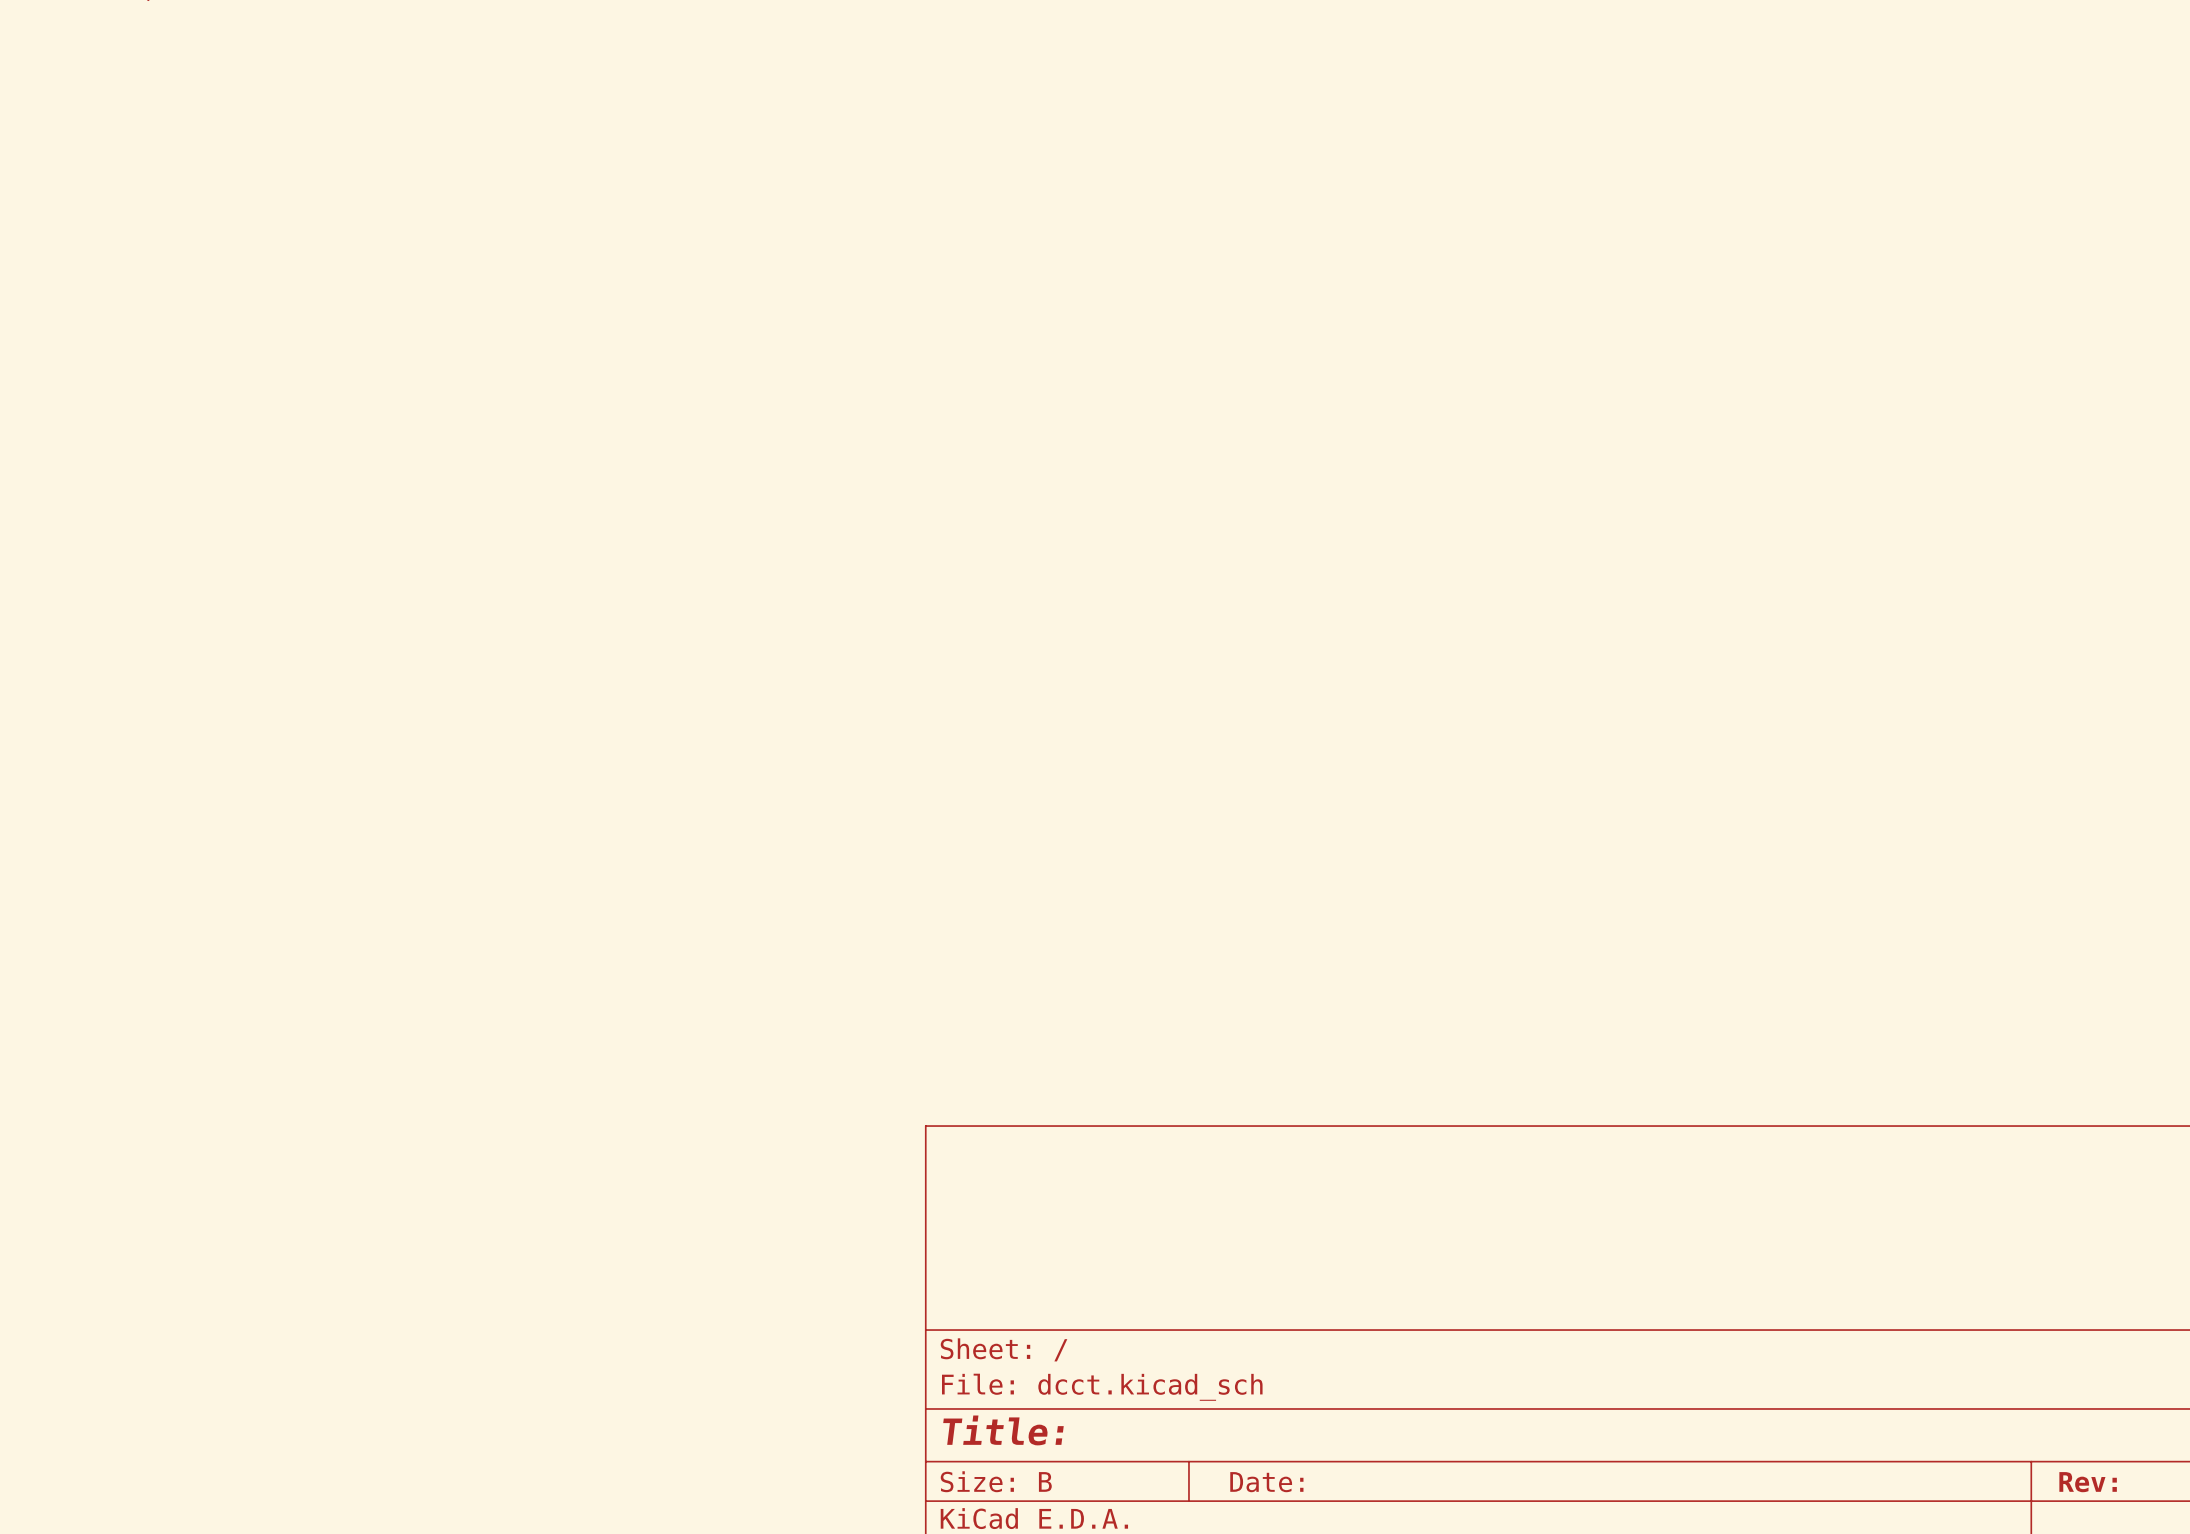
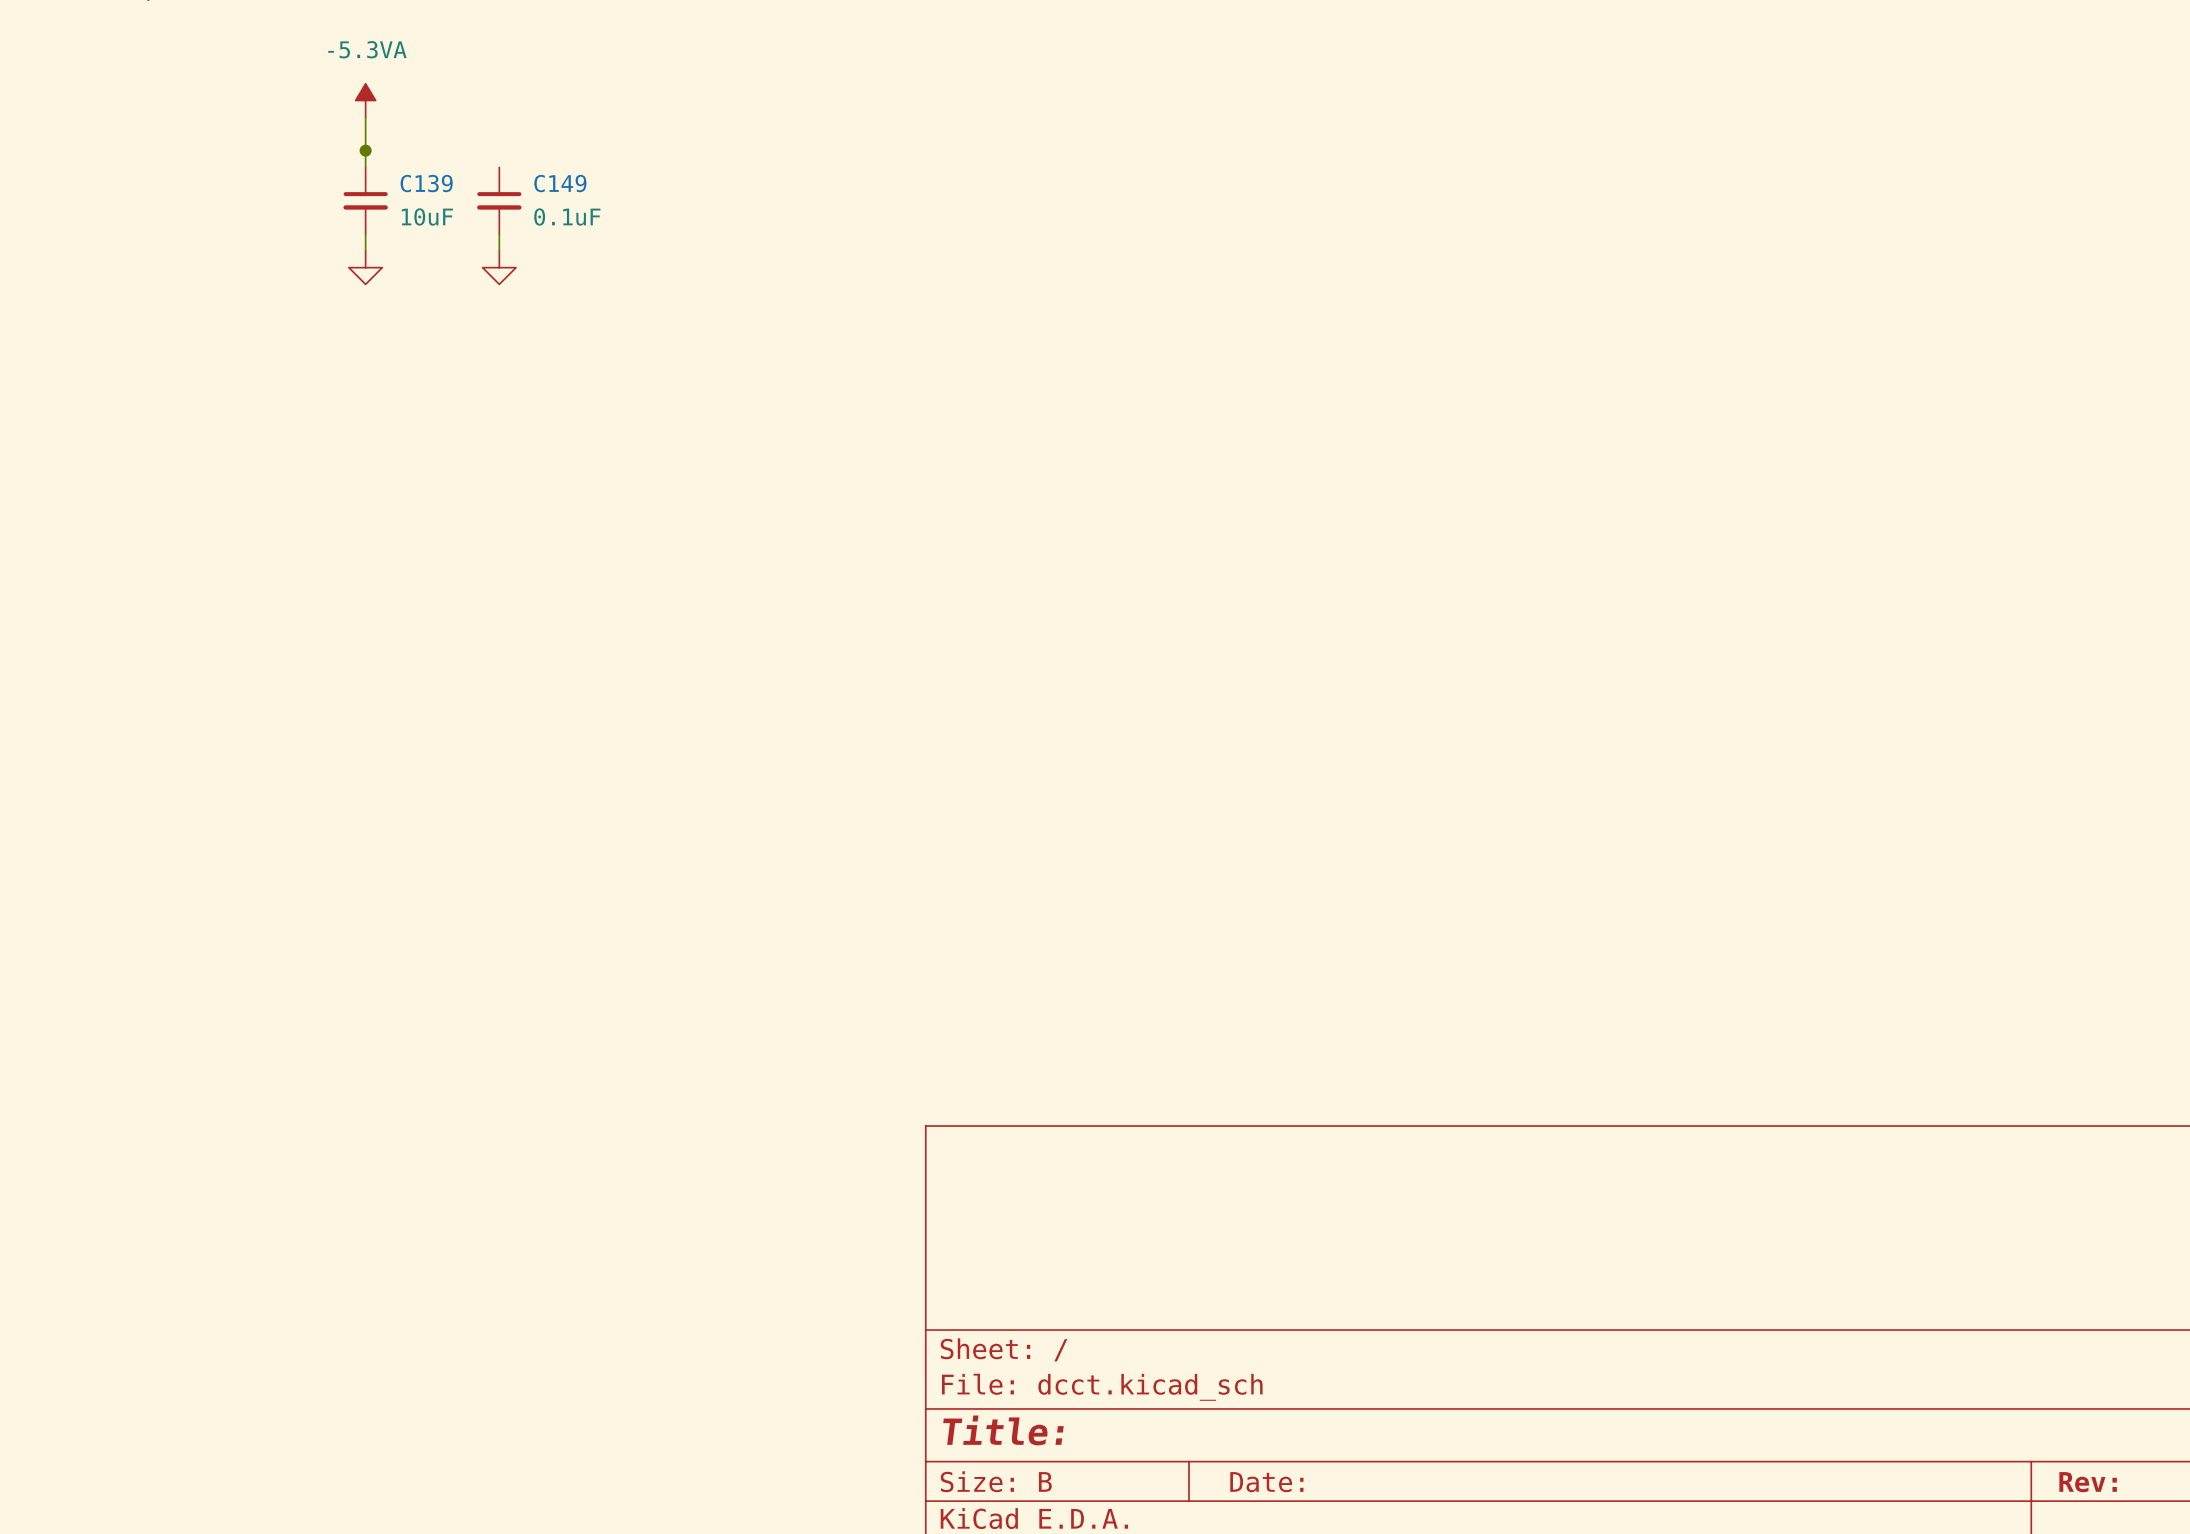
power symbol: none -> -5.3VA (365, 100)
wire: none -> (365, 117) (365, 167)
junction: none -> (365, 150)
C139: none -> 10uF (365, 200)
C149: none -> 0.1uF (499, 200)
wire: none -> (365, 234) (365, 250)
wire: none -> (499, 234) (499, 250)
power symbol: none -> (365, 267)
power symbol: none -> (499, 267)

